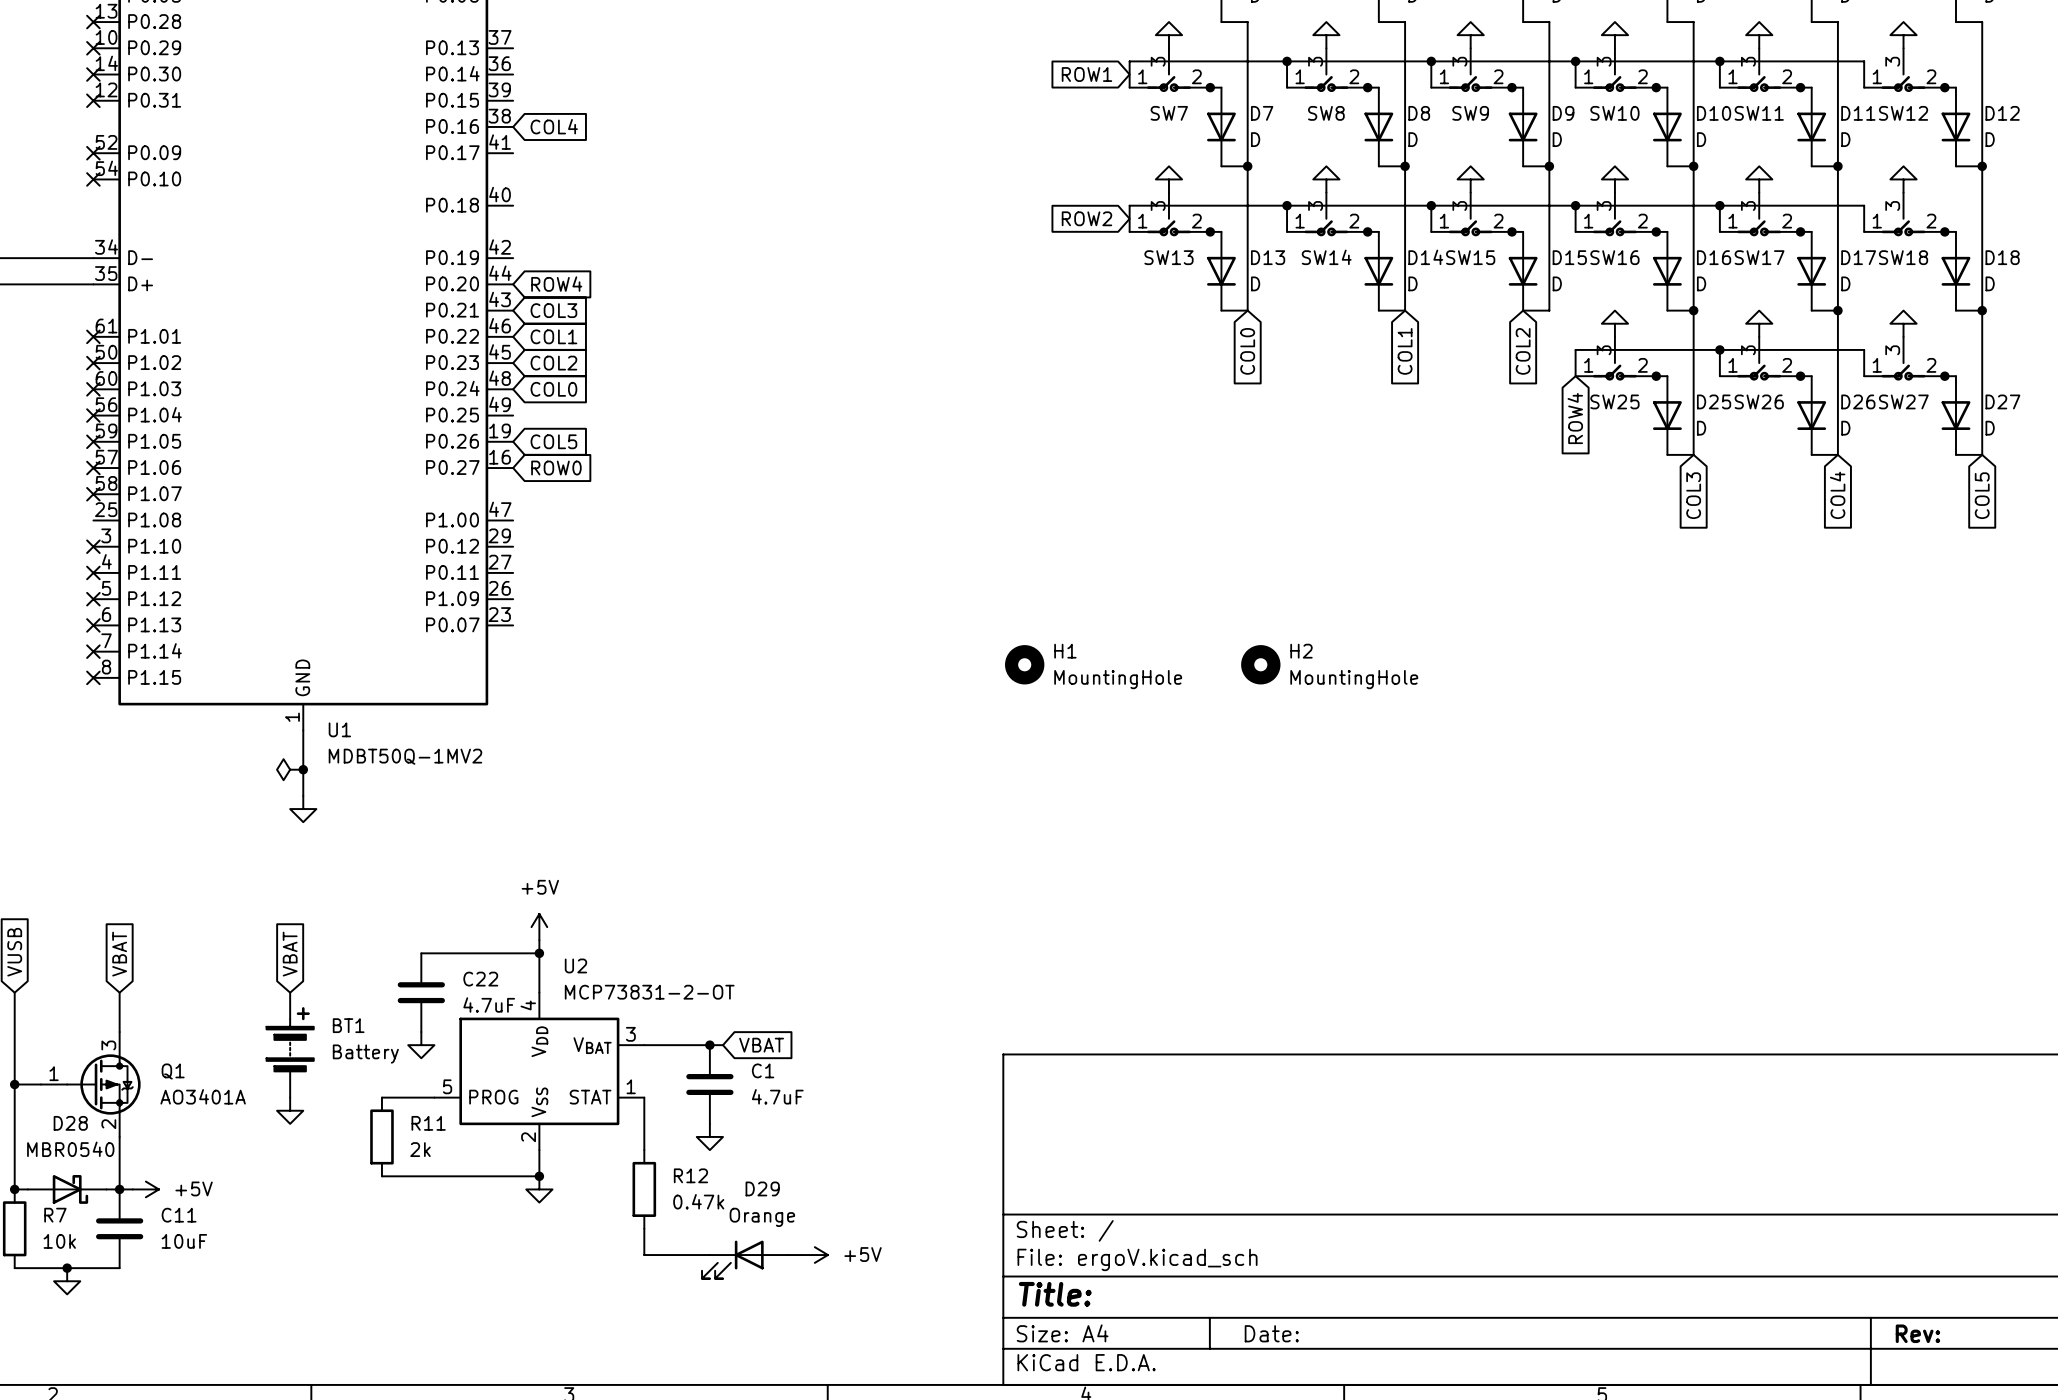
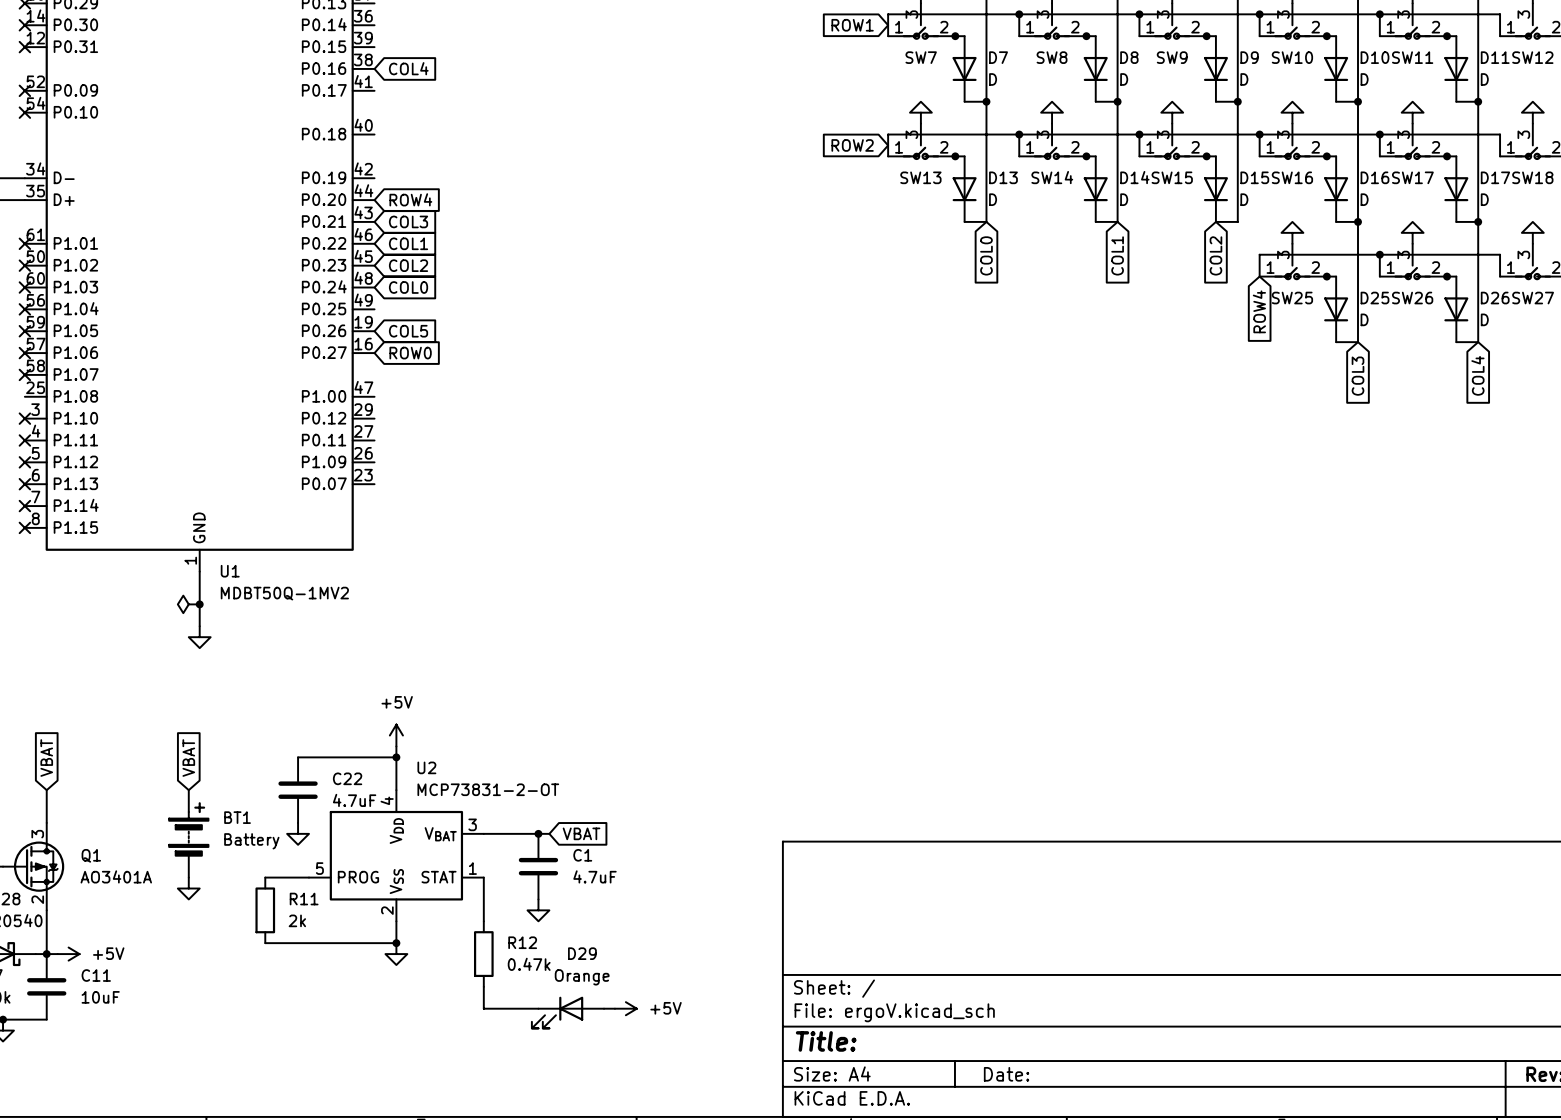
H1: MountingHole (1024, 664) -> none
H2: MountingHole (1260, 664) -> none

